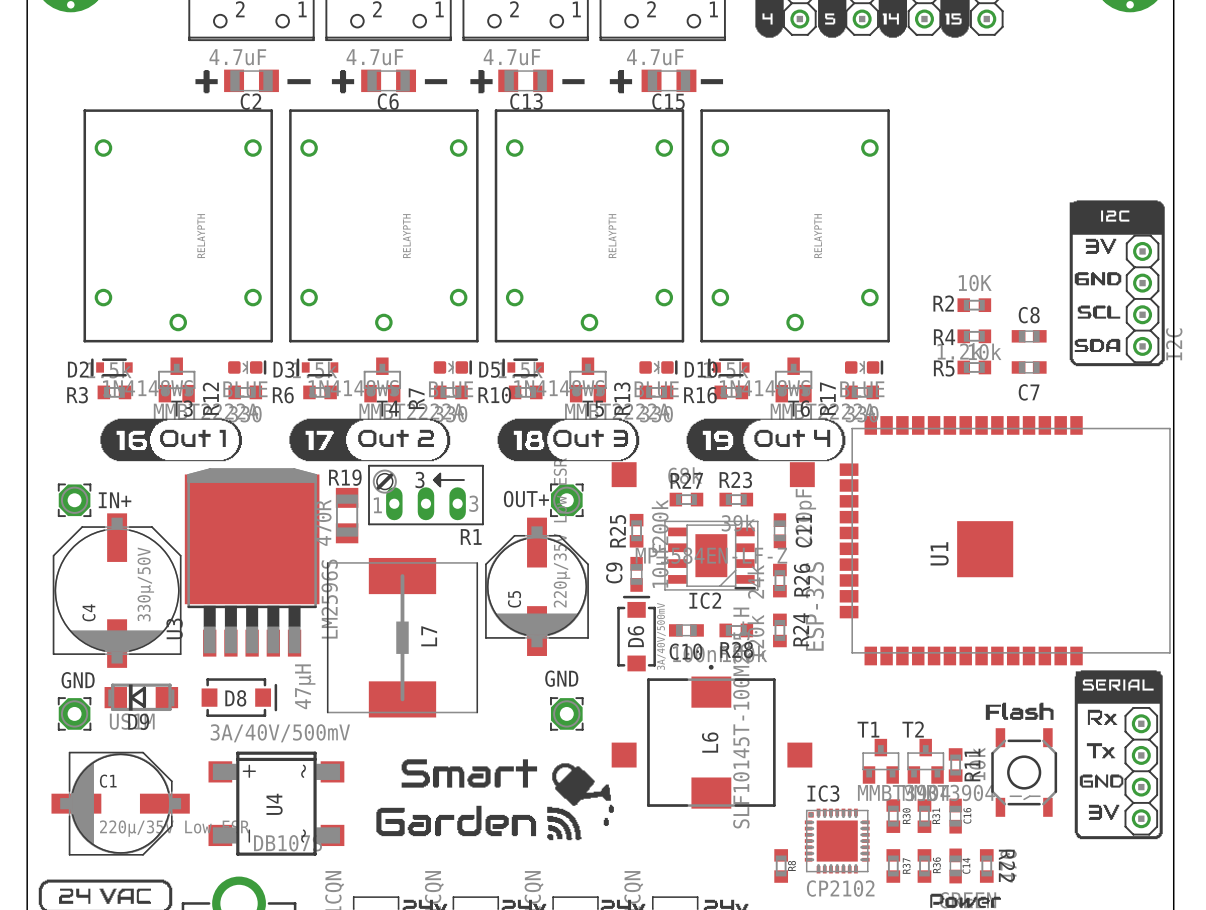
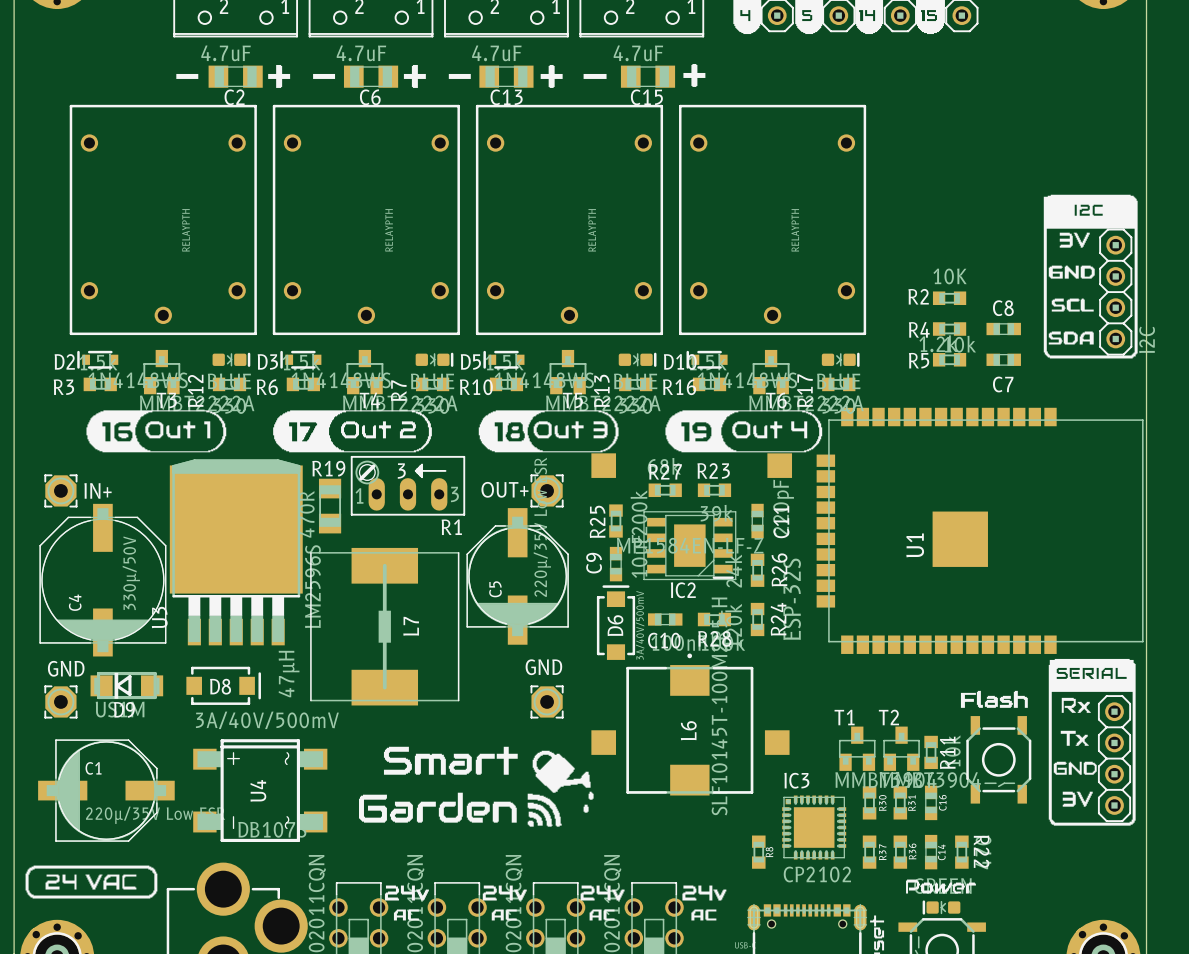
drawing: none -> [683, 63, 706, 87]
drawing: none -> [268, 64, 291, 88]
drawing: none -> [403, 64, 426, 88]
drawing: none -> [540, 64, 563, 88]
drawing: [195, 70, 218, 94] -> none
drawing: [331, 70, 355, 94] -> none
drawing: [470, 70, 493, 94] -> none
drawing: [609, 70, 633, 94] -> none
drawing: none -> [176, 73, 199, 79]
drawing: none -> [313, 73, 336, 79]
drawing: none -> [448, 73, 471, 79]
drawing: none -> [583, 73, 607, 79]
drawing: [287, 79, 311, 85] -> none
drawing: [424, 79, 448, 85] -> none
drawing: [562, 79, 585, 85] -> none
drawing: [700, 79, 724, 85] -> none

